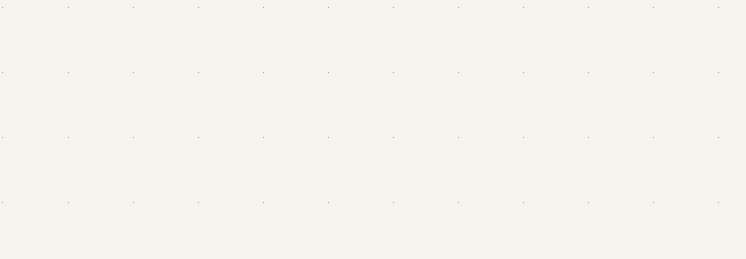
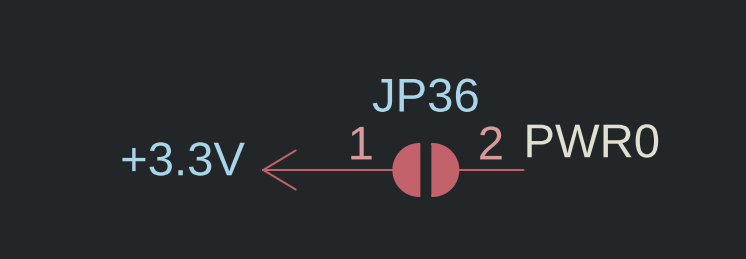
label: none -> PWR0 (592, 140)
power symbol: none -> +3.3V (295, 169)
JP36: none -> (425, 169)

